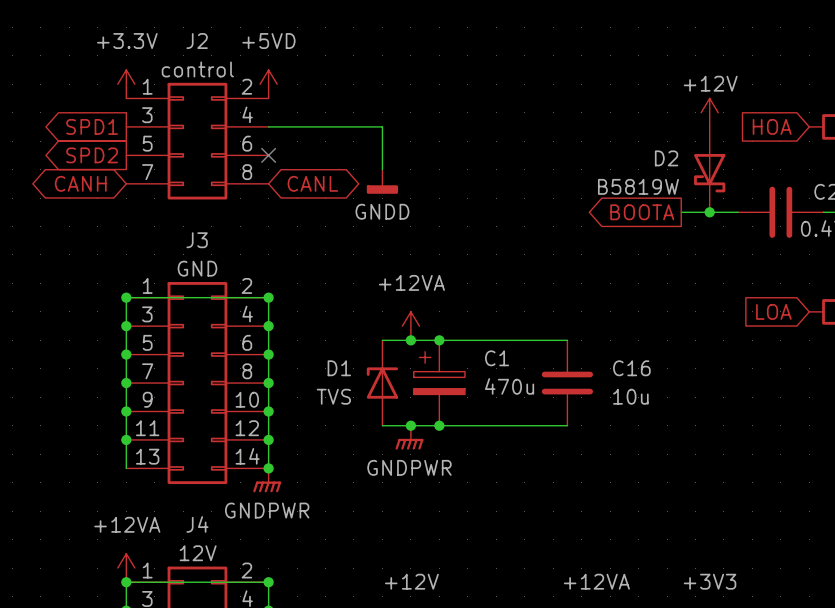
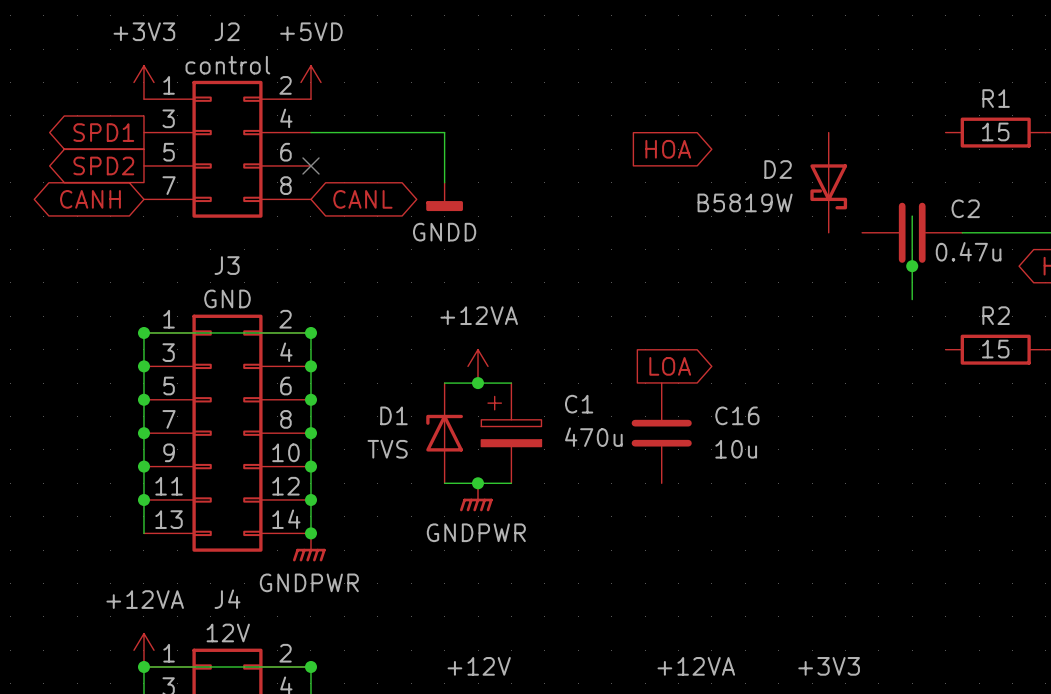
power symbol: +3.3V (126, 84) -> +3V3 (143, 82)
power symbol: +12V (709, 112) -> none
global label position: HOA (772, 126) -> HOA (668, 149)
wire: none -> (912, 216) (912, 299)
global label: BOOTA (642, 212) -> none
wire: (681, 212) (738, 212) -> none
junction: (709, 212) -> none
junction: none -> (912, 266)
global label position: LOA (773, 311) -> LOA (670, 366)
wire: (439, 340) (567, 340) -> none
junction: (439, 340) -> none
wire: (439, 425) (567, 425) -> none
junction: (439, 425) -> none

